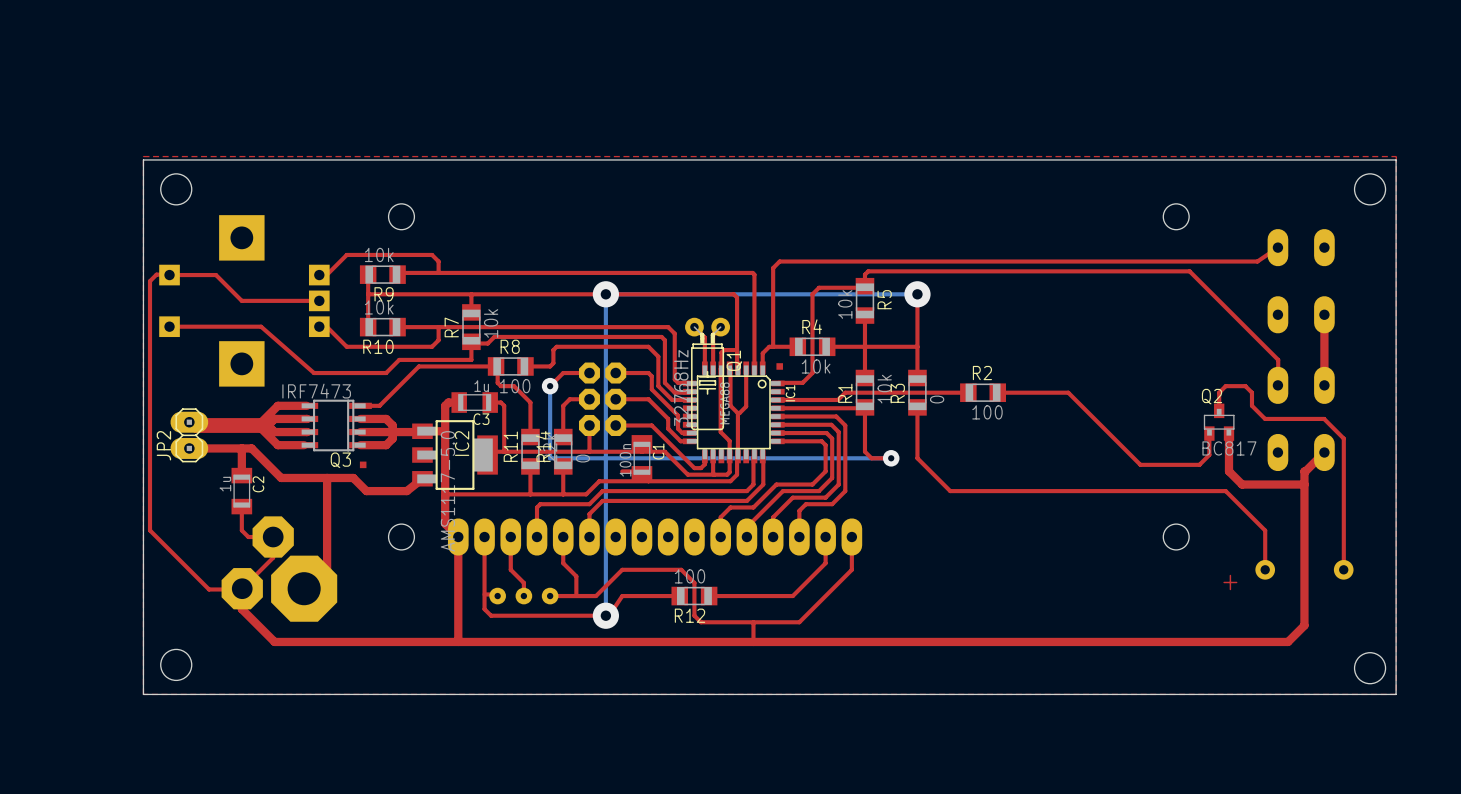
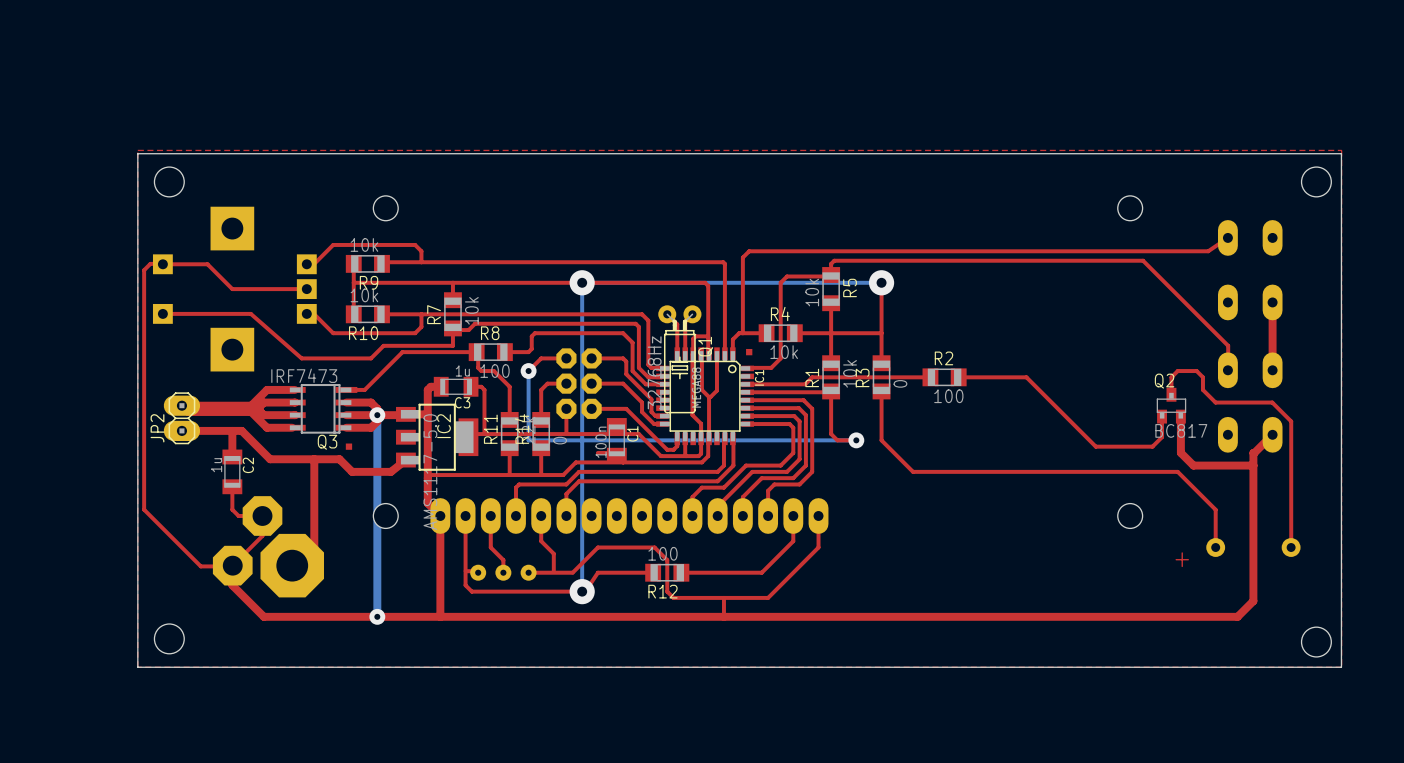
bottom track: none -> (377, 415) (377, 616)
via: none -> (377, 415)
via: none -> (377, 616)

